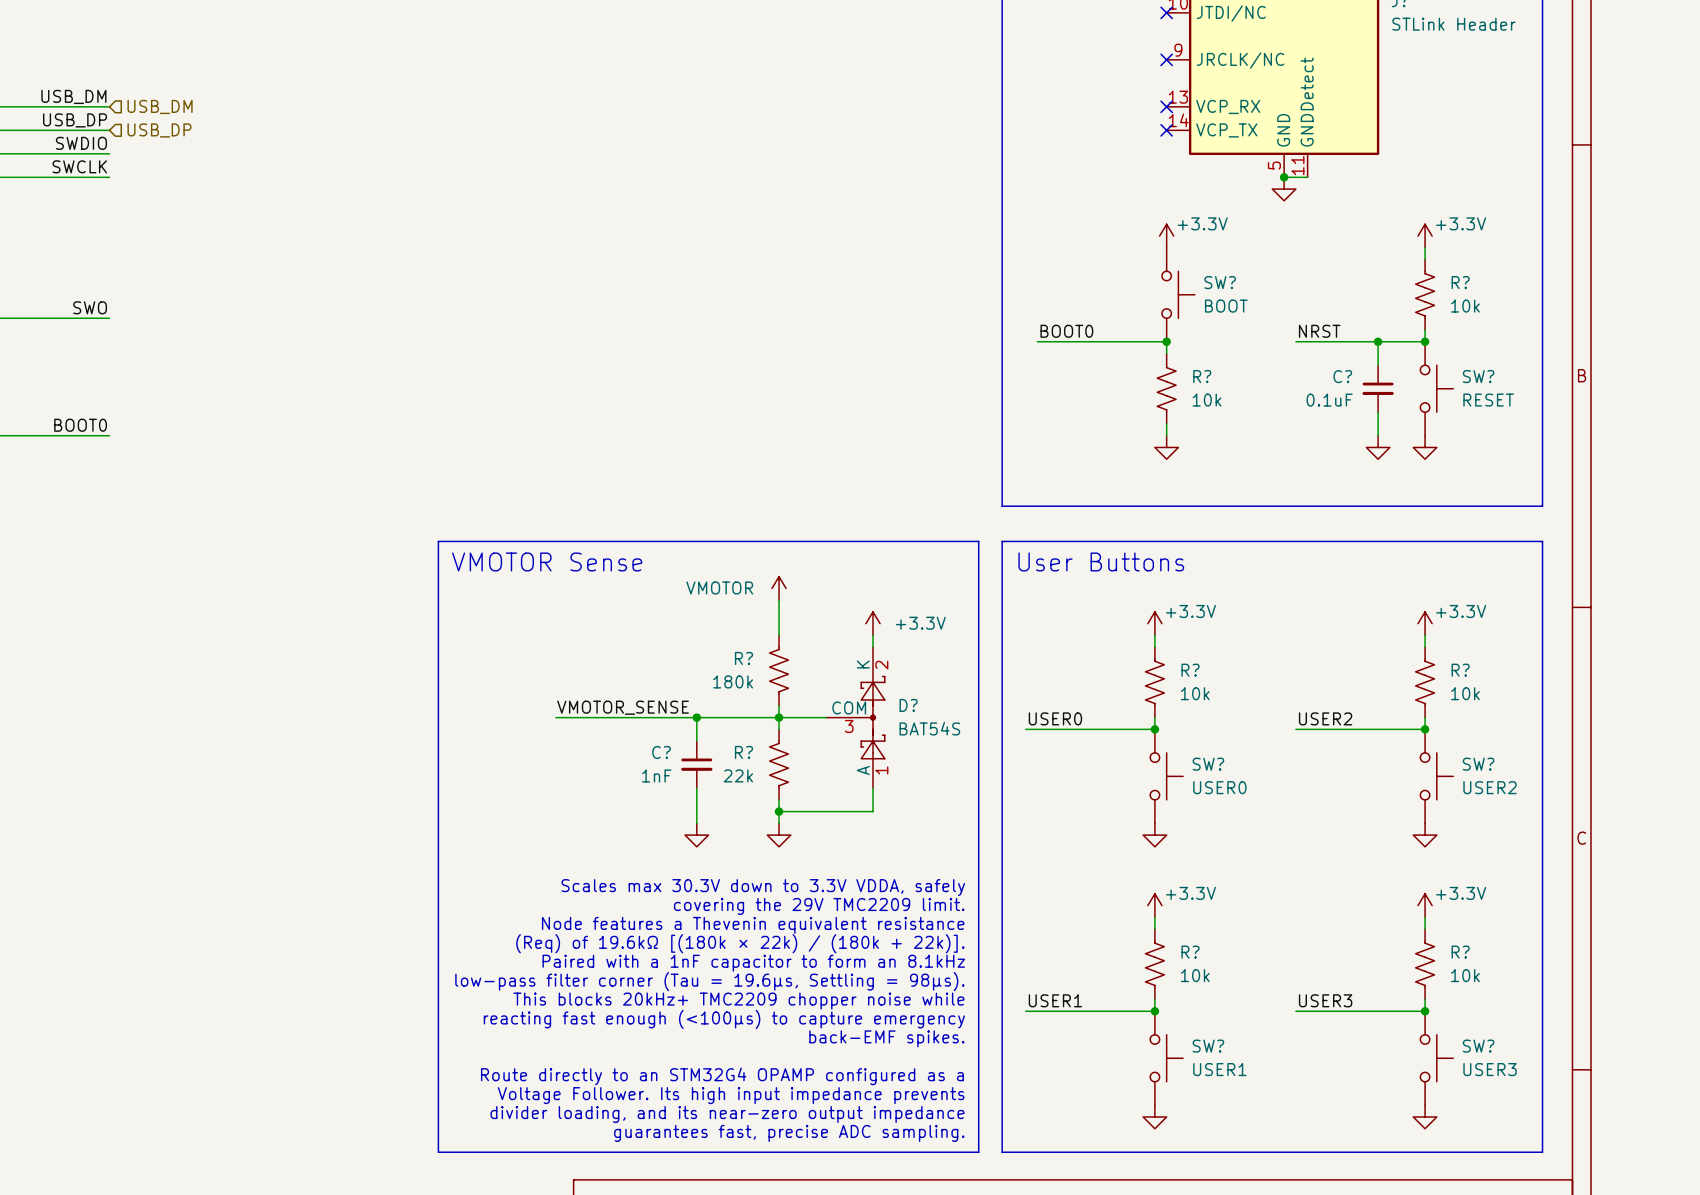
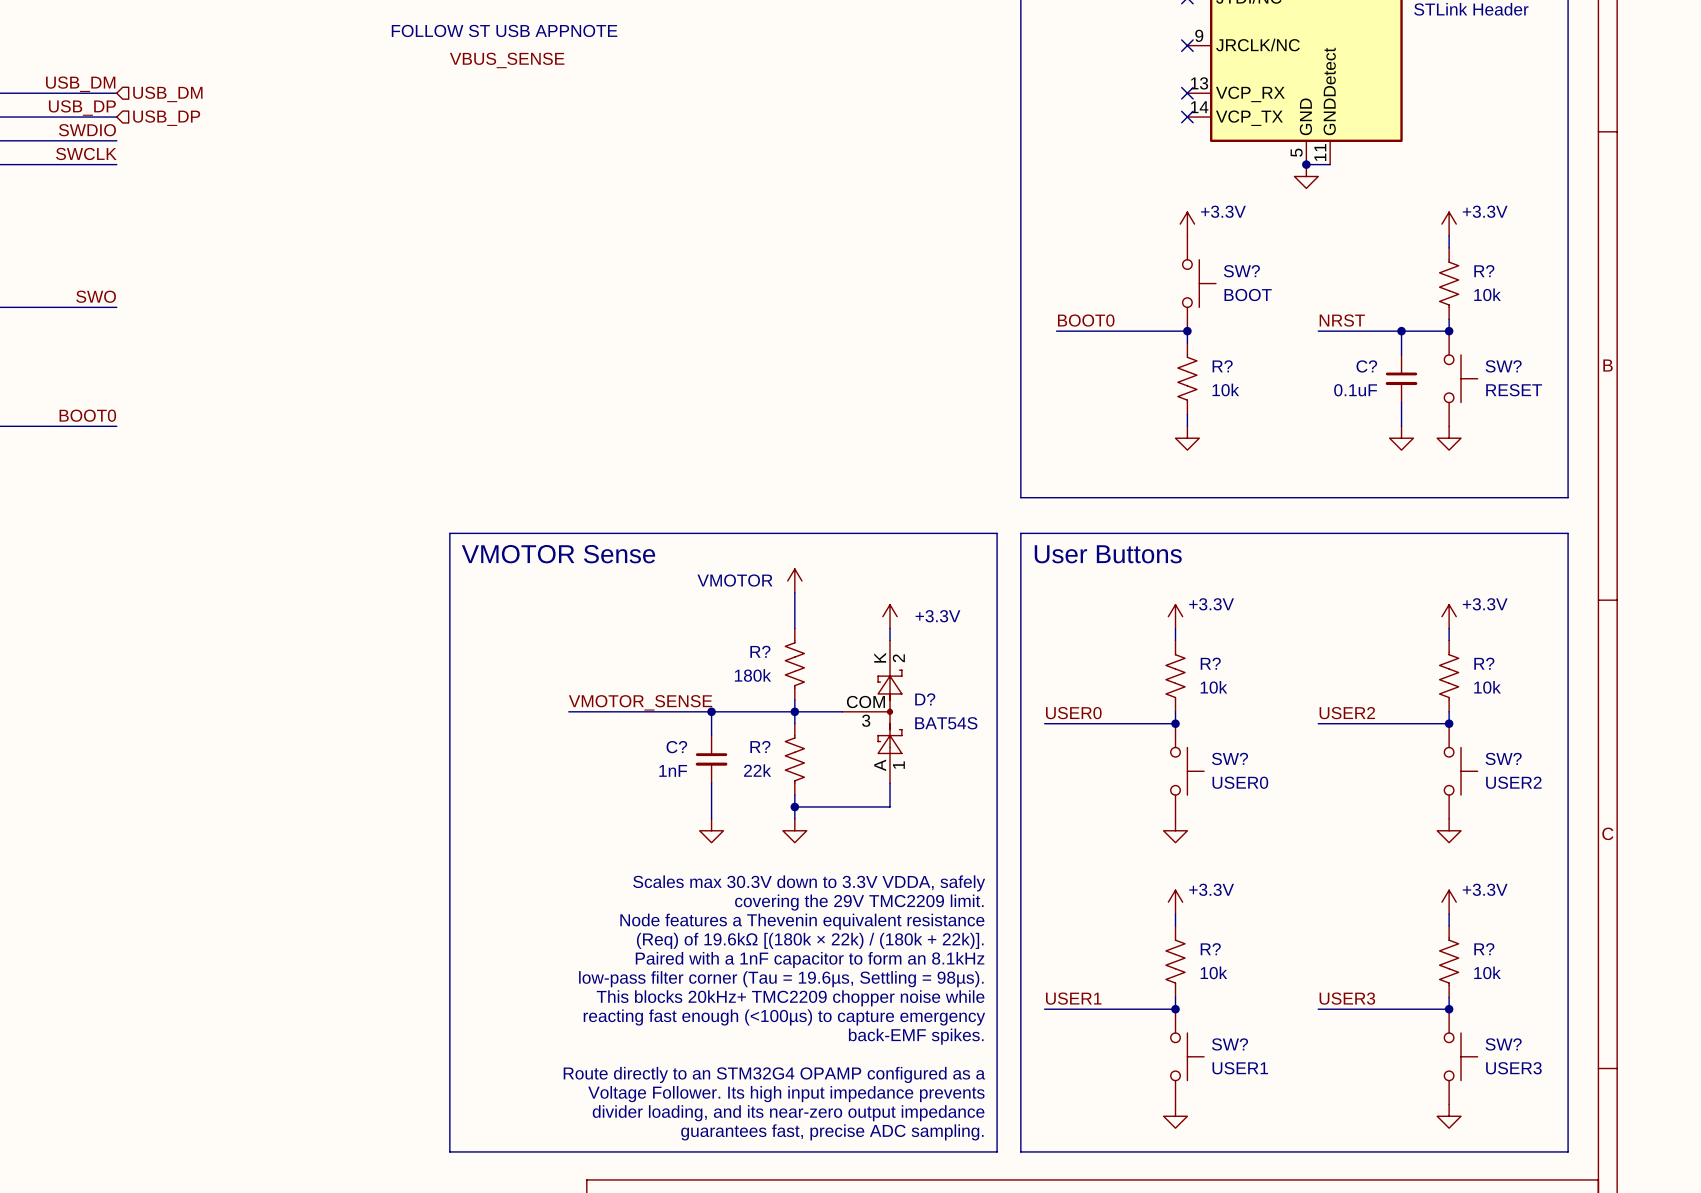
text: none -> FOLLOW ST USB APPNOTE (504, 30)
label: none -> VBUS_SENSE (507, 60)

